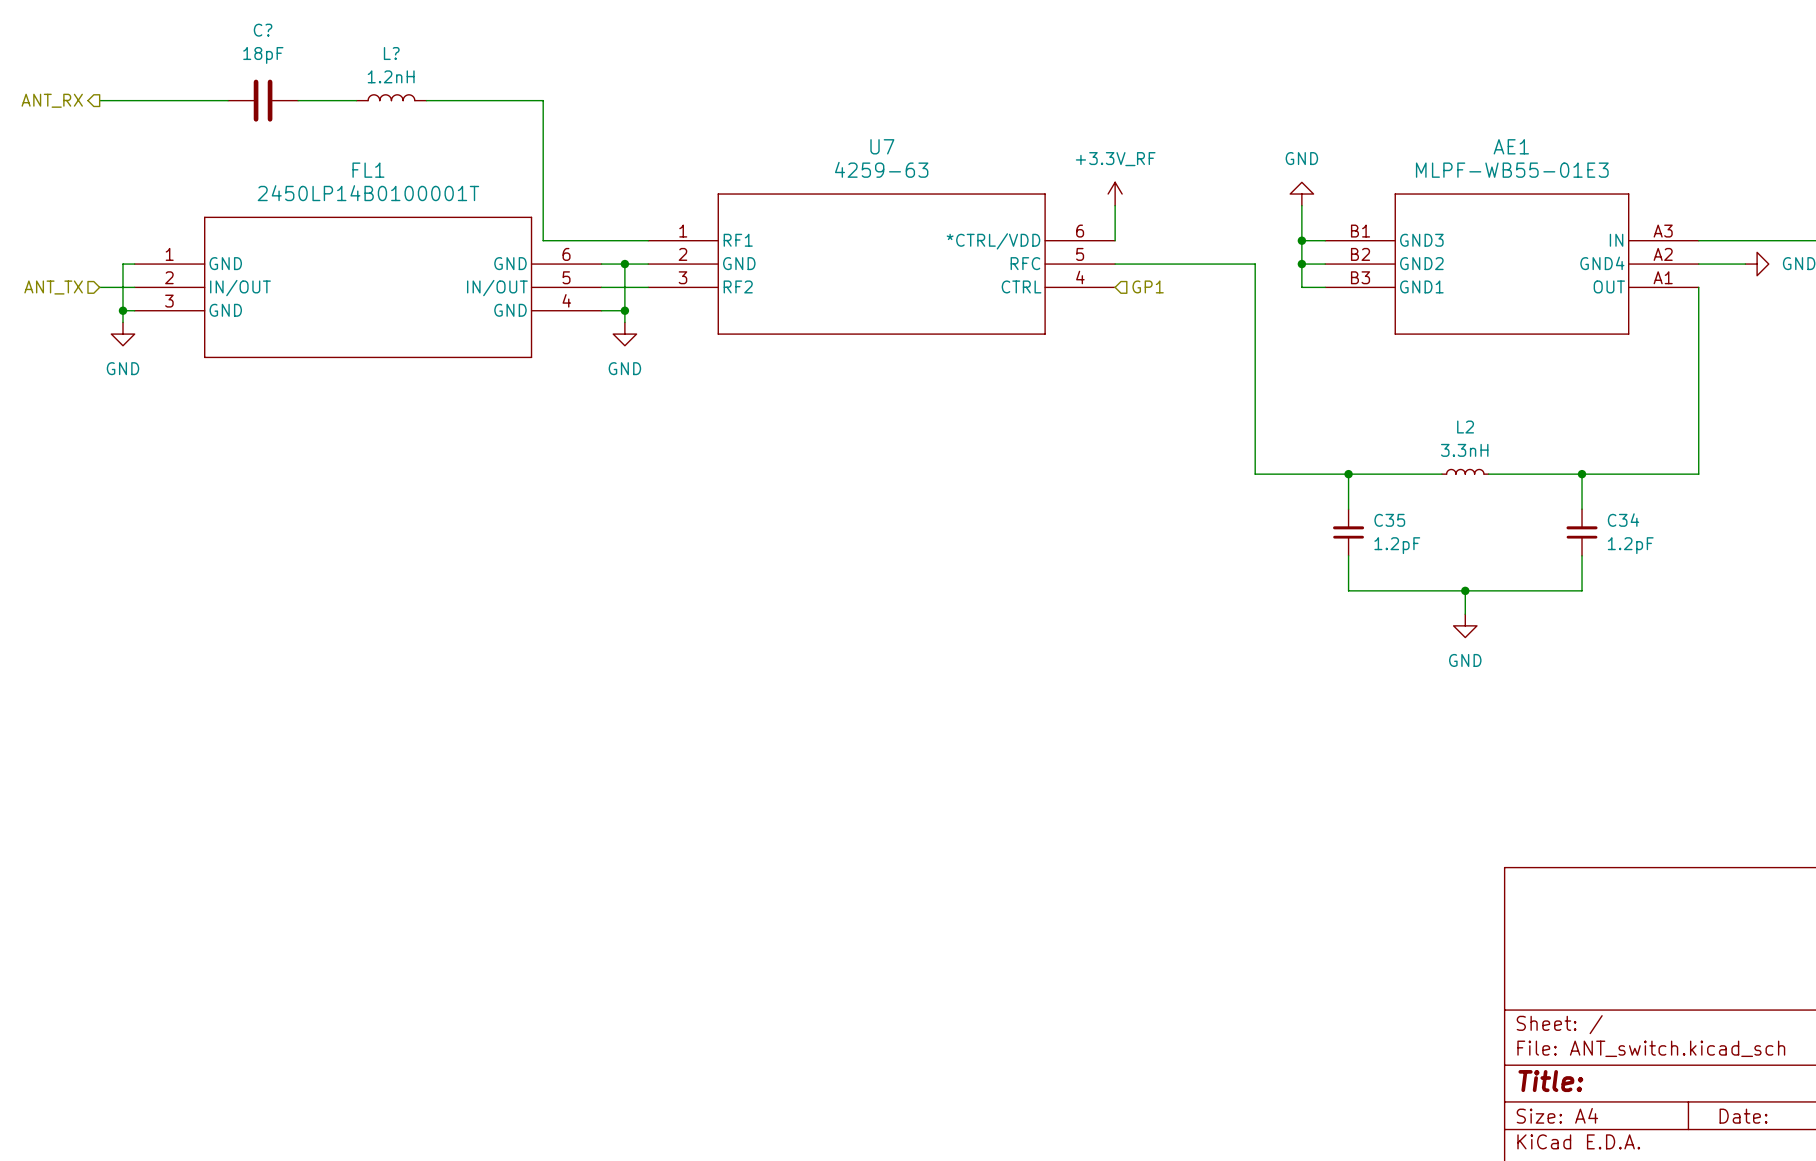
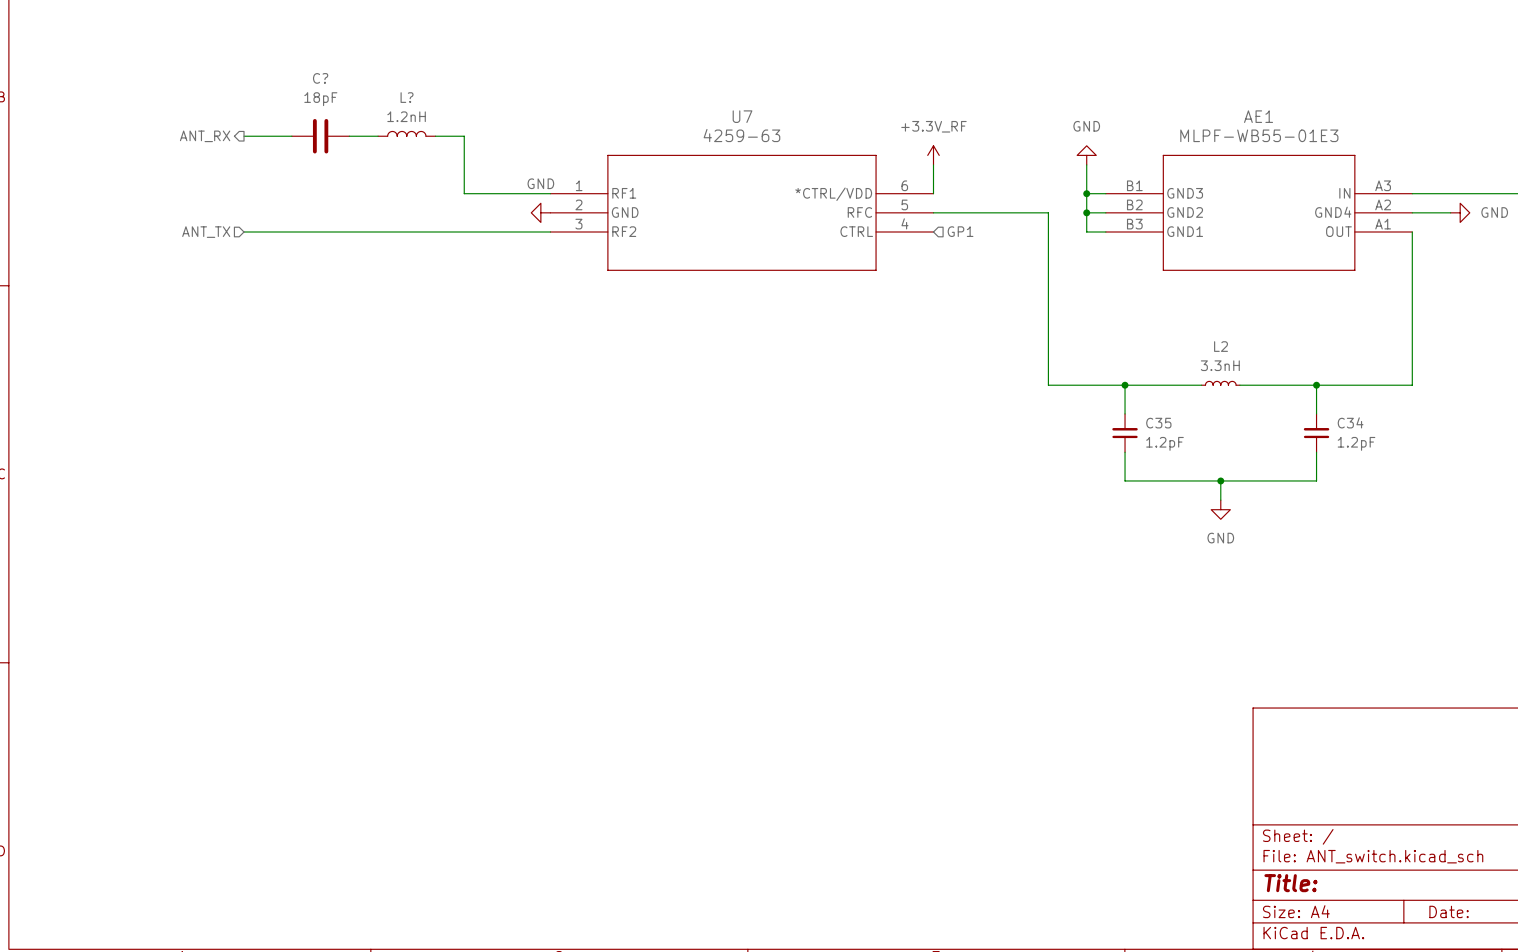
L? position: (391, 97) -> (406, 133)
hierarchical label position: ANT_RX (52, 100) -> ANT_RX (205, 136)
wire: (99, 100) (228, 100) -> none
C? position: (263, 100) -> (320, 136)
wire: (298, 100) (356, 100) -> (244, 136) (291, 136)
wire: (426, 100) (543, 100) (543, 170) -> (435, 136) (464, 136)
wire: none -> (349, 136) (378, 136)
wire: (134, 264) (123, 264) (123, 322) -> none
wire: (601, 264) (648, 264) -> none
wire: (624, 264) (624, 322) -> none
junction: (624, 264) -> none
hierarchical label position: ANT_TX (53, 287) -> ANT_TX (206, 232)
wire: (99, 287) (134, 287) -> none
wire: none -> (244, 232) (512, 232)
FL1: 2450LP14B0100001T (368, 287) -> none
wire: (123, 310) (134, 310) -> none
junction: (123, 310) -> none
wire: (601, 310) (624, 310) -> none
junction: (624, 310) -> none
power symbol: GND (123, 334) -> none
power symbol rotation: 0° (624, 334) -> 90° clockwise (540, 212)
power symbol position: GND (624, 334) -> GND (540, 212)
power symbol text position: GND (624, 368) -> GND (540, 183)

